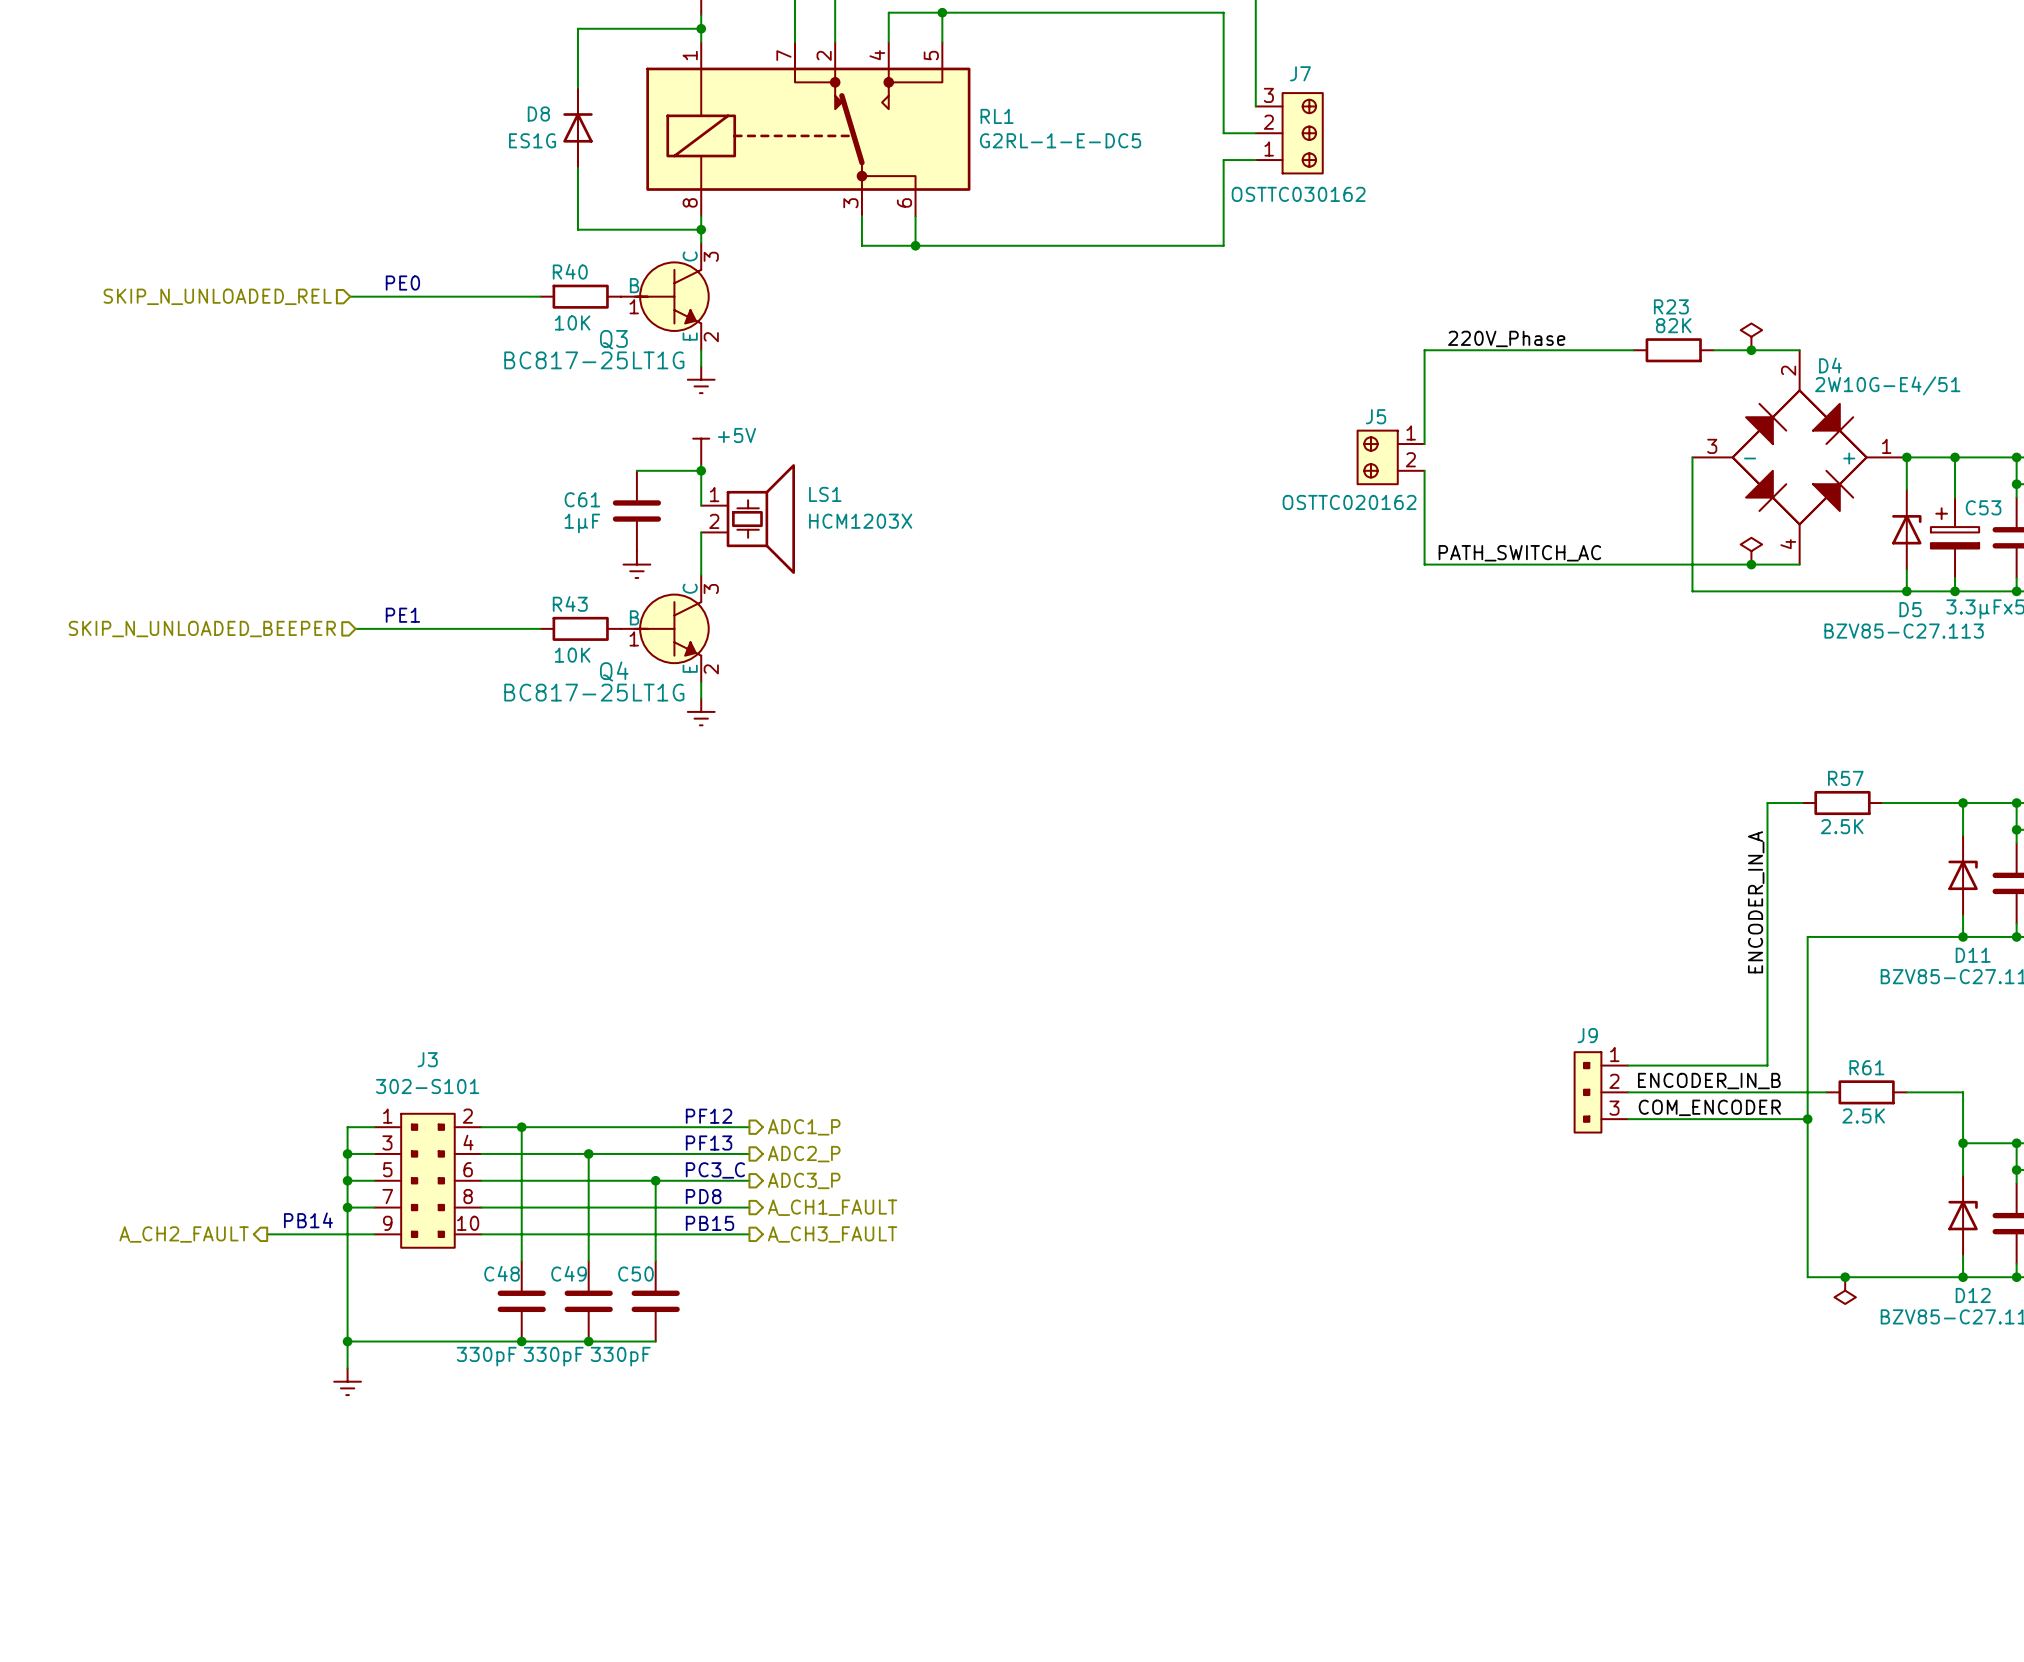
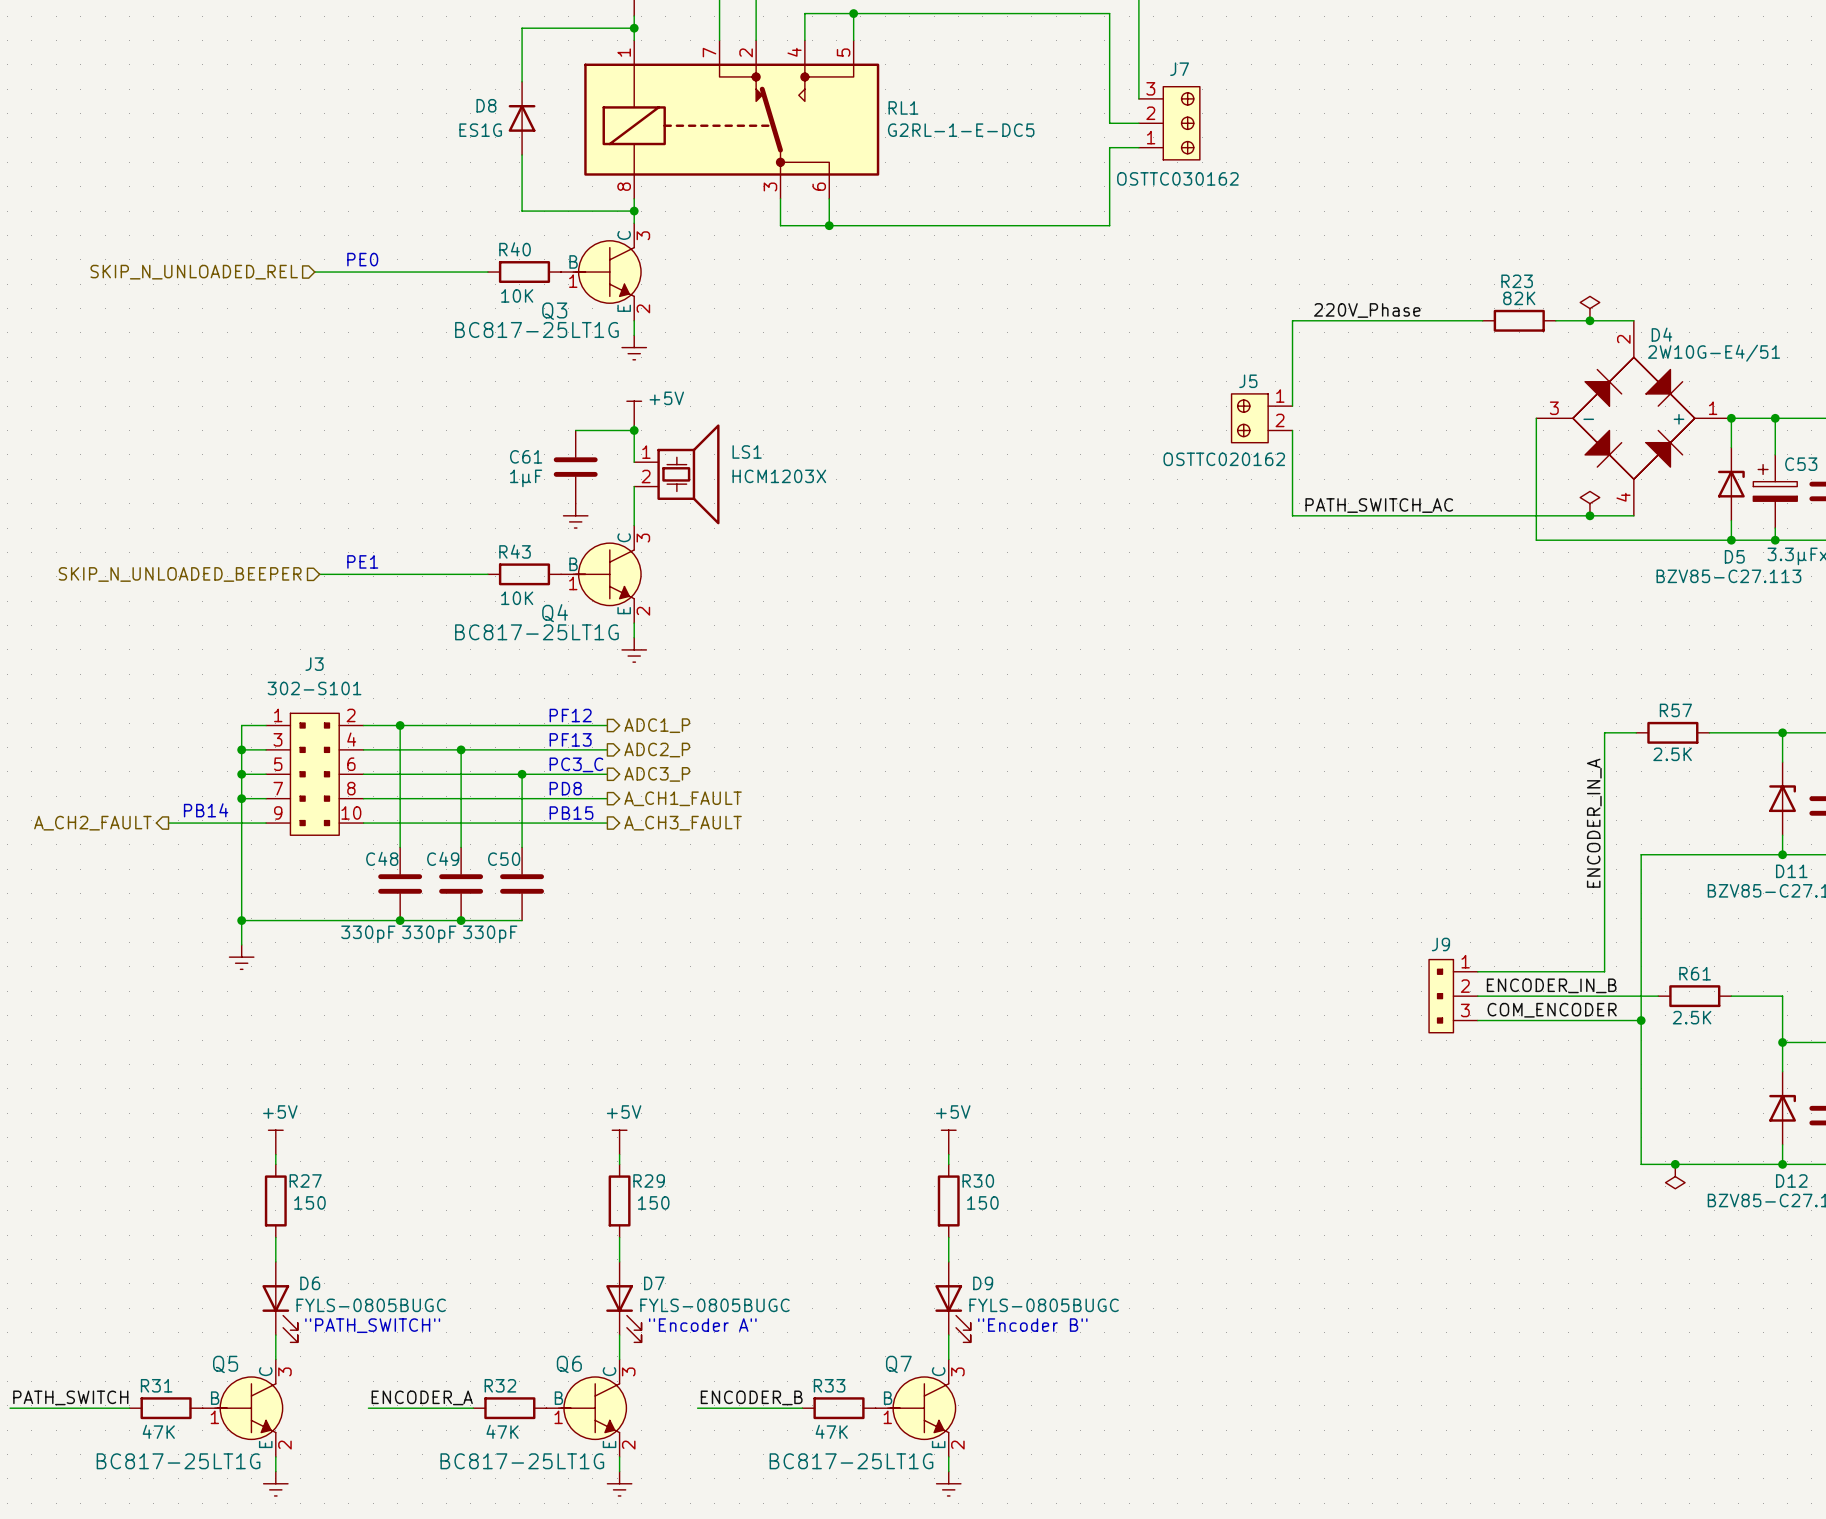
text: none -> PF12 (570, 715)
wire: none -> (266, 725) (241, 725) (241, 944)
wire: none -> (363, 725) (607, 725)
wire: none -> (400, 725) (400, 847)
junction: none -> (400, 725)
hierarchical label: none -> ADC1_P (657, 725)
text: none -> PF13 (570, 739)
wire: none -> (241, 749) (266, 749)
junction: none -> (241, 749)
wire: none -> (363, 749) (607, 749)
wire: none -> (461, 749) (461, 847)
junction: none -> (461, 749)
hierarchical label: none -> ADC2_P (657, 750)
text: none -> PC3_C (576, 764)
wire: none -> (241, 774) (266, 774)
junction: none -> (241, 774)
wire: none -> (363, 774) (607, 774)
wire: none -> (522, 774) (522, 847)
junction: none -> (522, 774)
hierarchical label: none -> ADC3_P (657, 774)
text: none -> PD8 (565, 788)
wire: none -> (241, 798) (266, 798)
junction: none -> (241, 798)
hierarchical label: none -> A_CH1_FAULT (683, 798)
text: none -> PB14 (206, 810)
text: none -> PB15 (571, 813)
hierarchical label: none -> A_CH2_FAULT (92, 823)
wire: none -> (168, 823) (266, 823)
hierarchical label: none -> A_CH3_FAULT (683, 823)
wire: none -> (241, 920) (522, 920)
junction: none -> (241, 920)
junction: none -> (400, 920)
junction: none -> (461, 920)
power symbol: none -> (241, 957)
text: PF12 (709, 1116) -> none
wire: (374, 1127) (347, 1127) (347, 1368) -> none
wire: (481, 1127) (749, 1127) -> (363, 798) (607, 798)
wire: (521, 1127) (521, 1261) -> none
junction: (521, 1127) -> none
hierarchical label: ADC1_P (804, 1127) -> none
text: PF13 (709, 1143) -> none
wire: (347, 1153) (374, 1153) -> none
junction: (347, 1153) -> none
wire: (481, 1153) (749, 1153) -> (363, 823) (607, 823)
wire: (588, 1153) (588, 1261) -> none
junction: (588, 1153) -> none
hierarchical label: ADC2_P (804, 1154) -> none
text: PC3_C (715, 1170) -> none
wire: (347, 1180) (374, 1180) -> none
junction: (347, 1180) -> none
J3 position: (427, 1180) -> (314, 774)
wire: (481, 1180) (749, 1180) -> none
wire: (655, 1180) (655, 1261) -> none
junction: (655, 1180) -> none
hierarchical label: ADC3_P (804, 1180) -> none
text: PD8 (703, 1196) -> none
wire: (347, 1207) (374, 1207) -> none
junction: (347, 1207) -> none
wire: (481, 1207) (749, 1207) -> none
hierarchical label: A_CH1_FAULT (832, 1207) -> none
text: PB14 (308, 1220) -> none
text: PB15 (709, 1223) -> none
hierarchical label: A_CH2_FAULT (184, 1234) -> none
wire: (267, 1234) (374, 1234) -> none
wire: (481, 1234) (749, 1234) -> none
hierarchical label: A_CH3_FAULT (832, 1234) -> none
power symbol: none -> +5V (275, 1142)
power symbol: none -> +5V (619, 1142)
power symbol: none -> +5V (948, 1142)
wire: none -> (275, 1154) (275, 1164)
wire: none -> (619, 1154) (619, 1164)
wire: none -> (948, 1154) (948, 1164)
C48 position: (521, 1301) -> (400, 883)
C49 position: (588, 1301) -> (461, 883)
C50 position: (655, 1301) -> (522, 883)
R27: none -> 150 (275, 1200)
R29: none -> 150 (619, 1200)
R30: none -> 150 (948, 1200)
wire: (347, 1341) (655, 1341) -> none
junction: (347, 1341) -> none
junction: (521, 1341) -> none
junction: (588, 1341) -> none
wire: none -> (275, 1237) (275, 1261)
wire: none -> (619, 1237) (619, 1261)
wire: none -> (948, 1237) (948, 1261)
power symbol: (347, 1381) -> none
D6: none -> FYLS-0805BUGC (280, 1302)
D7: none -> FYLS-0805BUGC (623, 1302)
D9: none -> FYLS-0805BUGC (953, 1302)
text: none -> "Encoder A" (702, 1325)
text: none -> "Encoder B" (1032, 1325)
text: none -> "PATH_SWITCH" (372, 1325)
wire: none -> (275, 1335) (275, 1359)
wire: none -> (619, 1335) (619, 1359)
wire: none -> (948, 1335) (948, 1359)
label: none -> PATH_SWITCH (70, 1397)
label: none -> ENCODER_A (422, 1397)
label: none -> ENCODER_B (751, 1397)
wire: none -> (10, 1408) (129, 1408)
R31: none -> 47K (166, 1408)
Q5: none -> BC817-25LT1G (242, 1408)
wire: none -> (368, 1408) (473, 1408)
R32: none -> 47K (509, 1408)
Q6: none -> BC817-25LT1G (586, 1408)
wire: none -> (697, 1408) (802, 1408)
R33: none -> 47K (839, 1408)
Q7: none -> BC817-25LT1G (915, 1408)
wire: none -> (275, 1456) (275, 1471)
wire: none -> (619, 1456) (619, 1471)
wire: none -> (948, 1456) (948, 1471)
power symbol: none -> (275, 1483)
power symbol: none -> (619, 1483)
power symbol: none -> (948, 1483)

